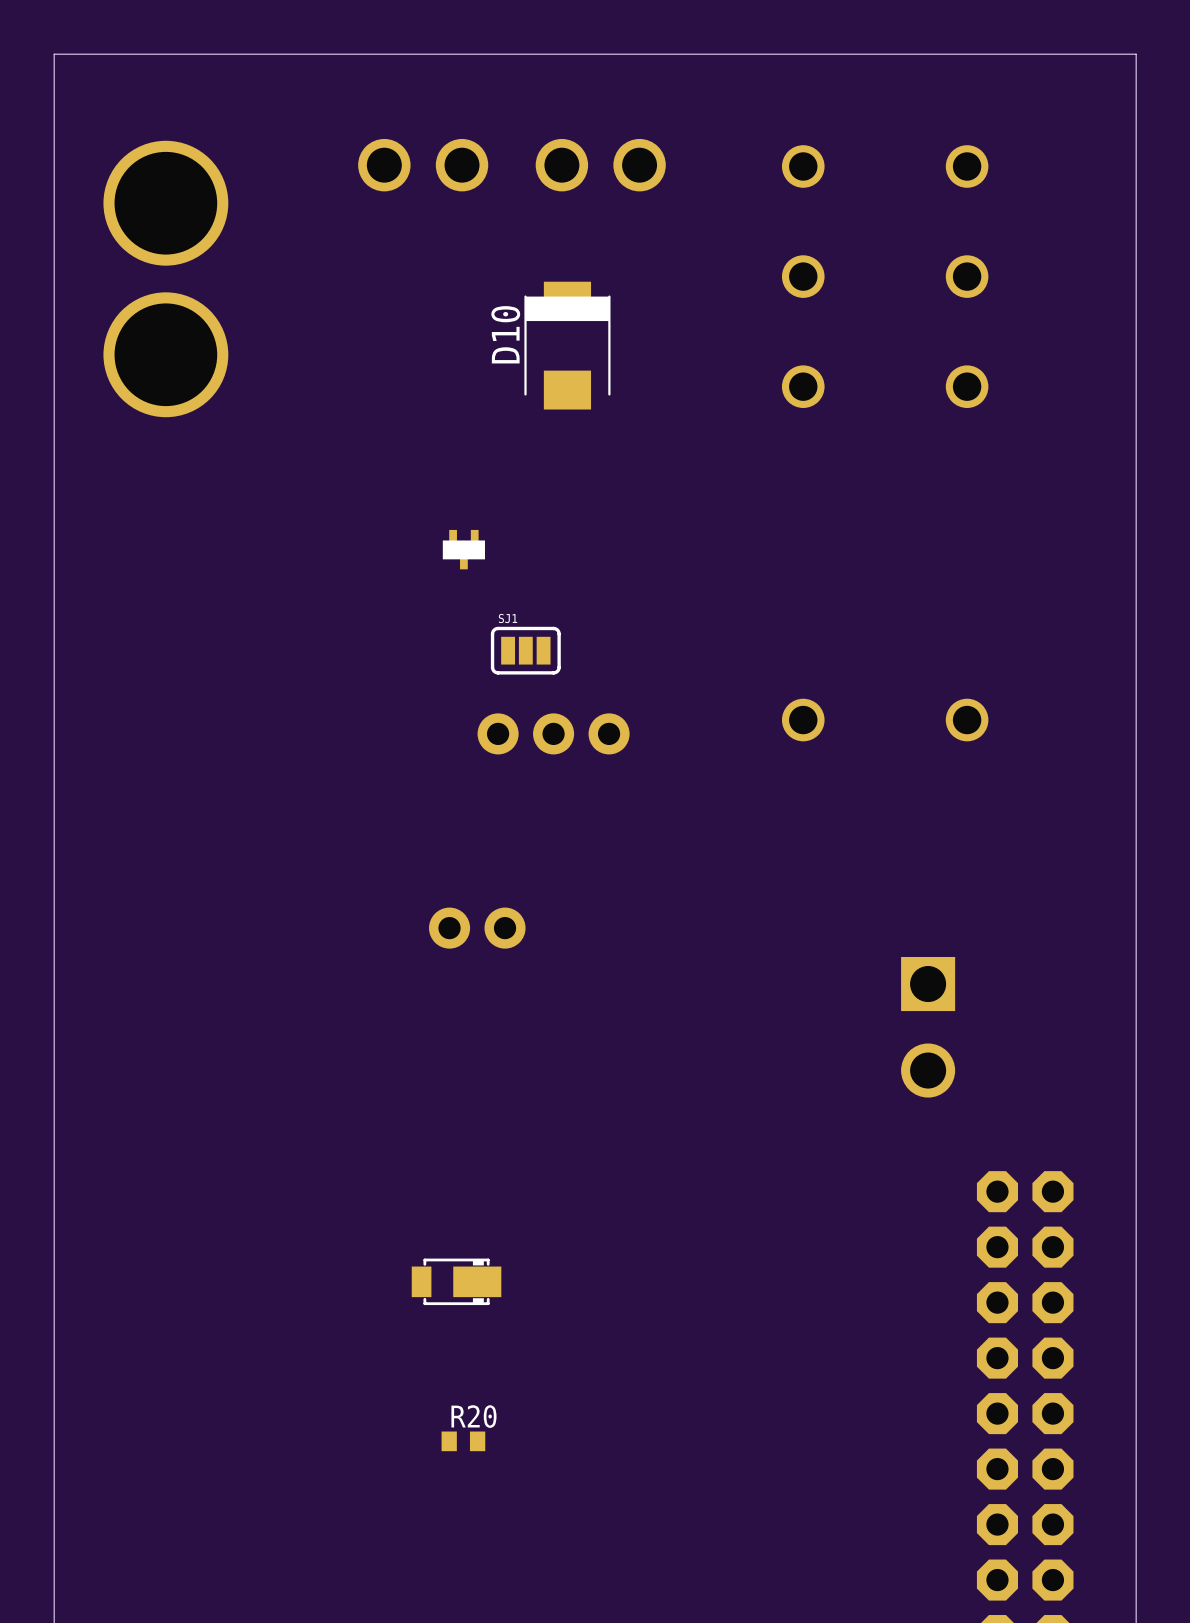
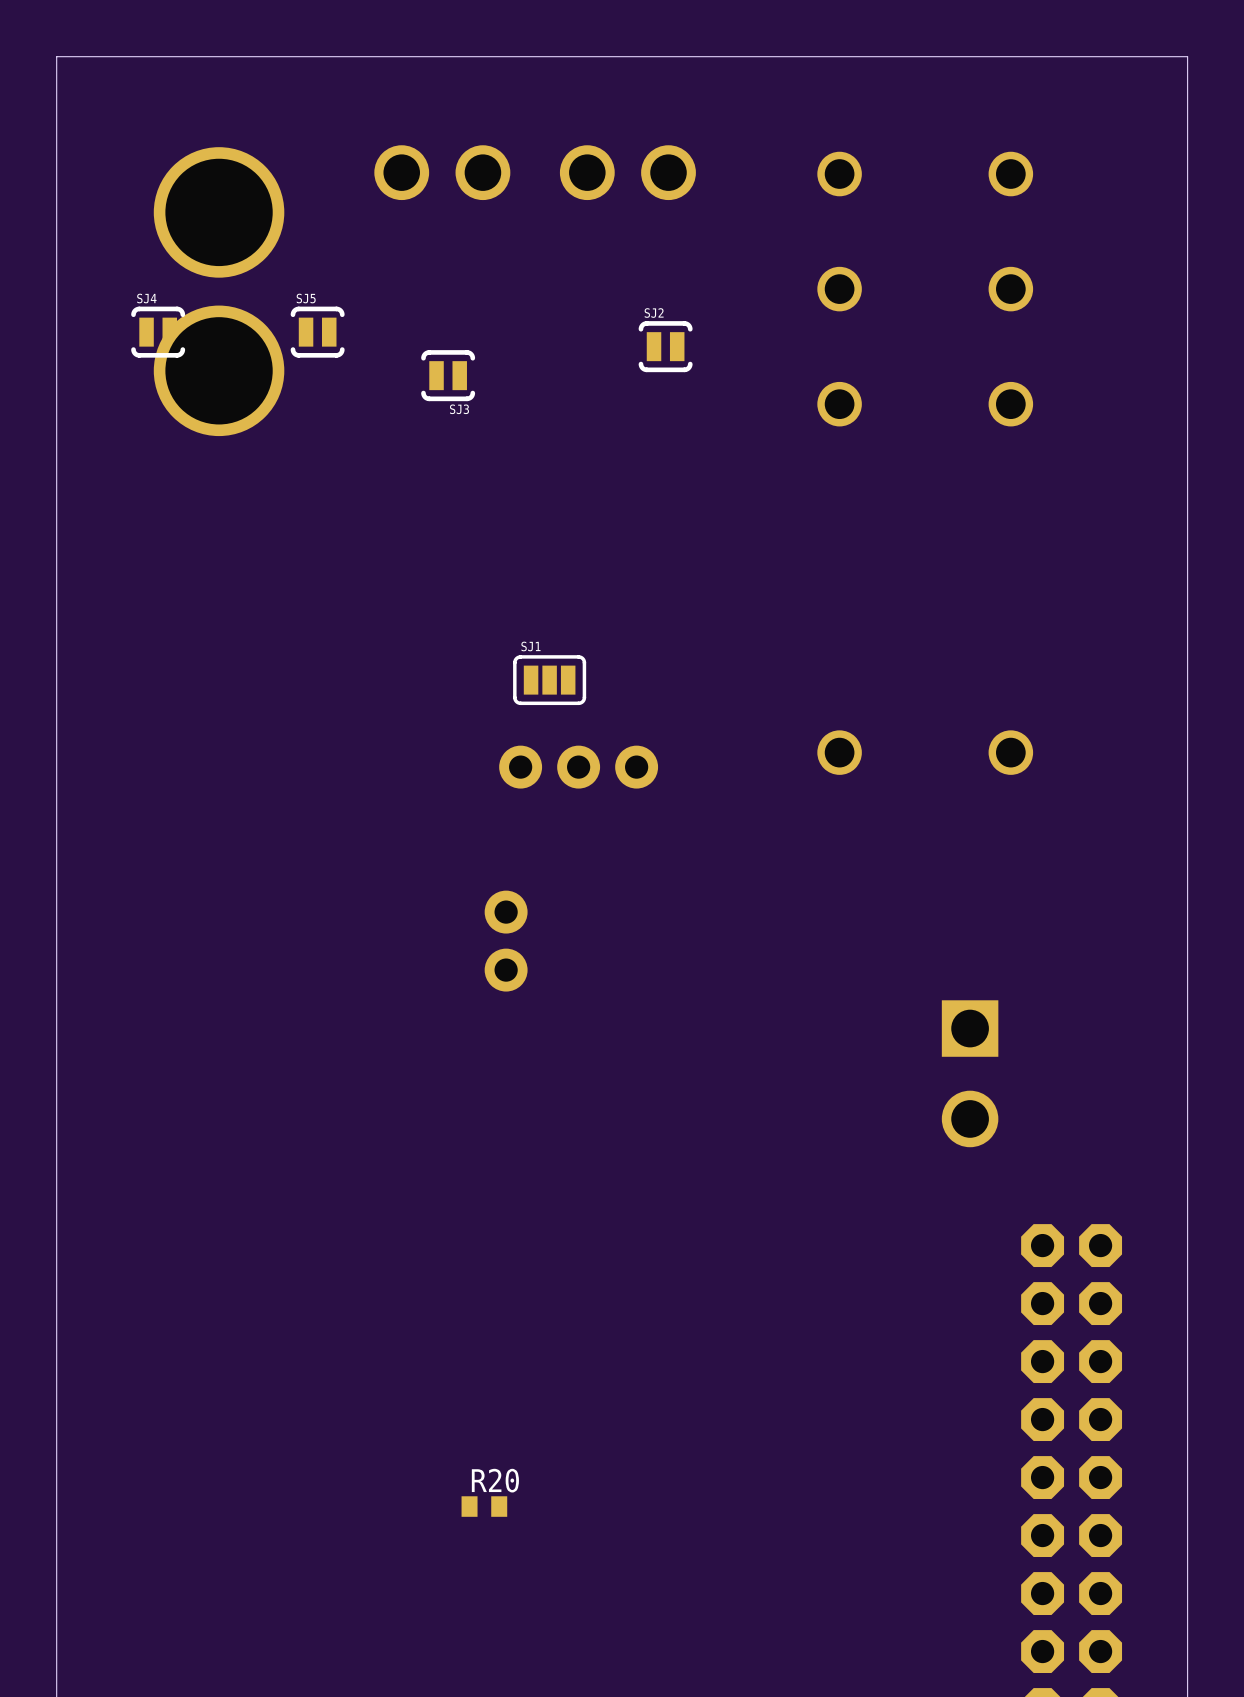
part position: (165, 278) -> (219, 291)
SJ4: none -> (158, 332)
SJ5: none -> (317, 332)
SJ2: none -> (665, 346)
D10: (567, 345) -> none
SJ3: none -> (448, 375)
part: (463, 549) -> none
part rotation: 0° (477, 928) -> 90° clockwise (506, 941)
part: (456, 1281) -> none

